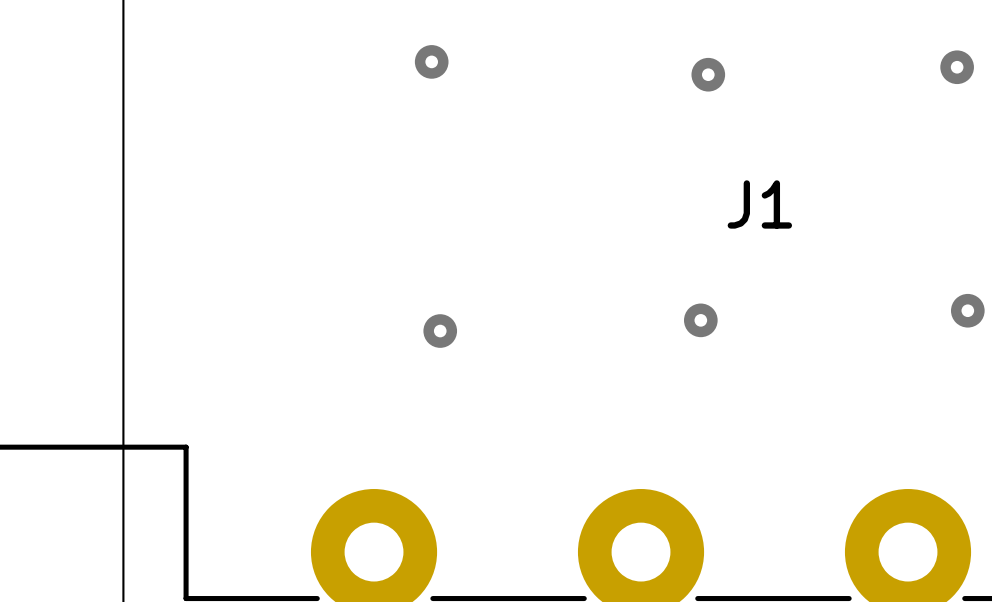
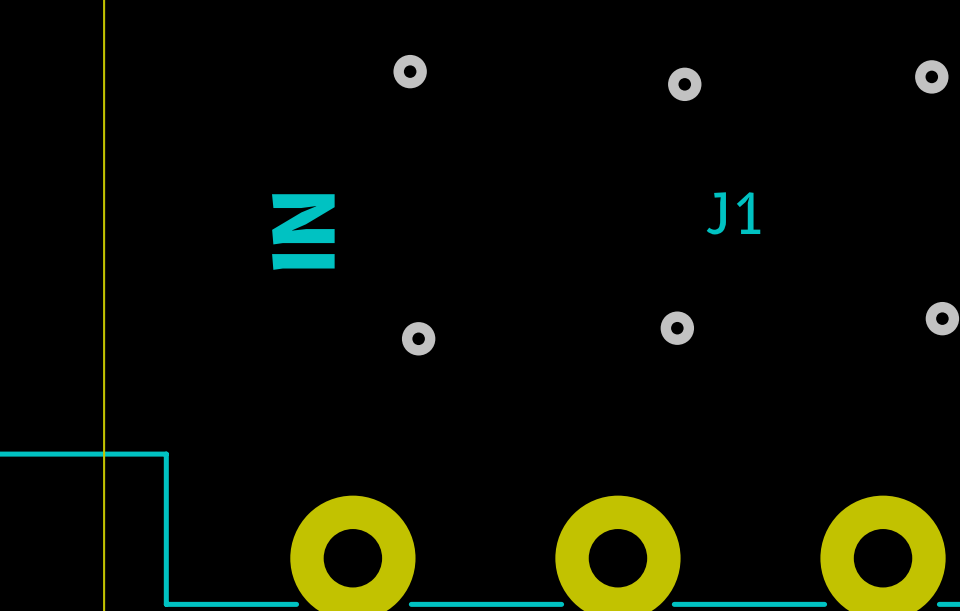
text: none -> IN (303, 232)

